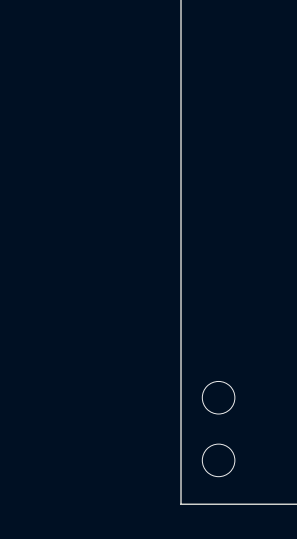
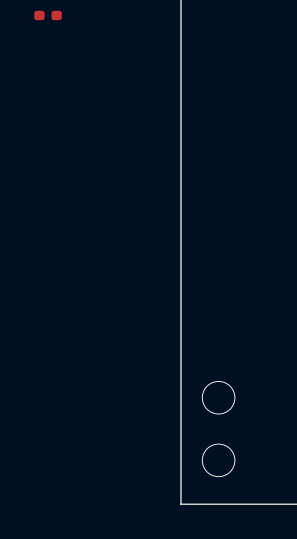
part: none -> (48, 15)

